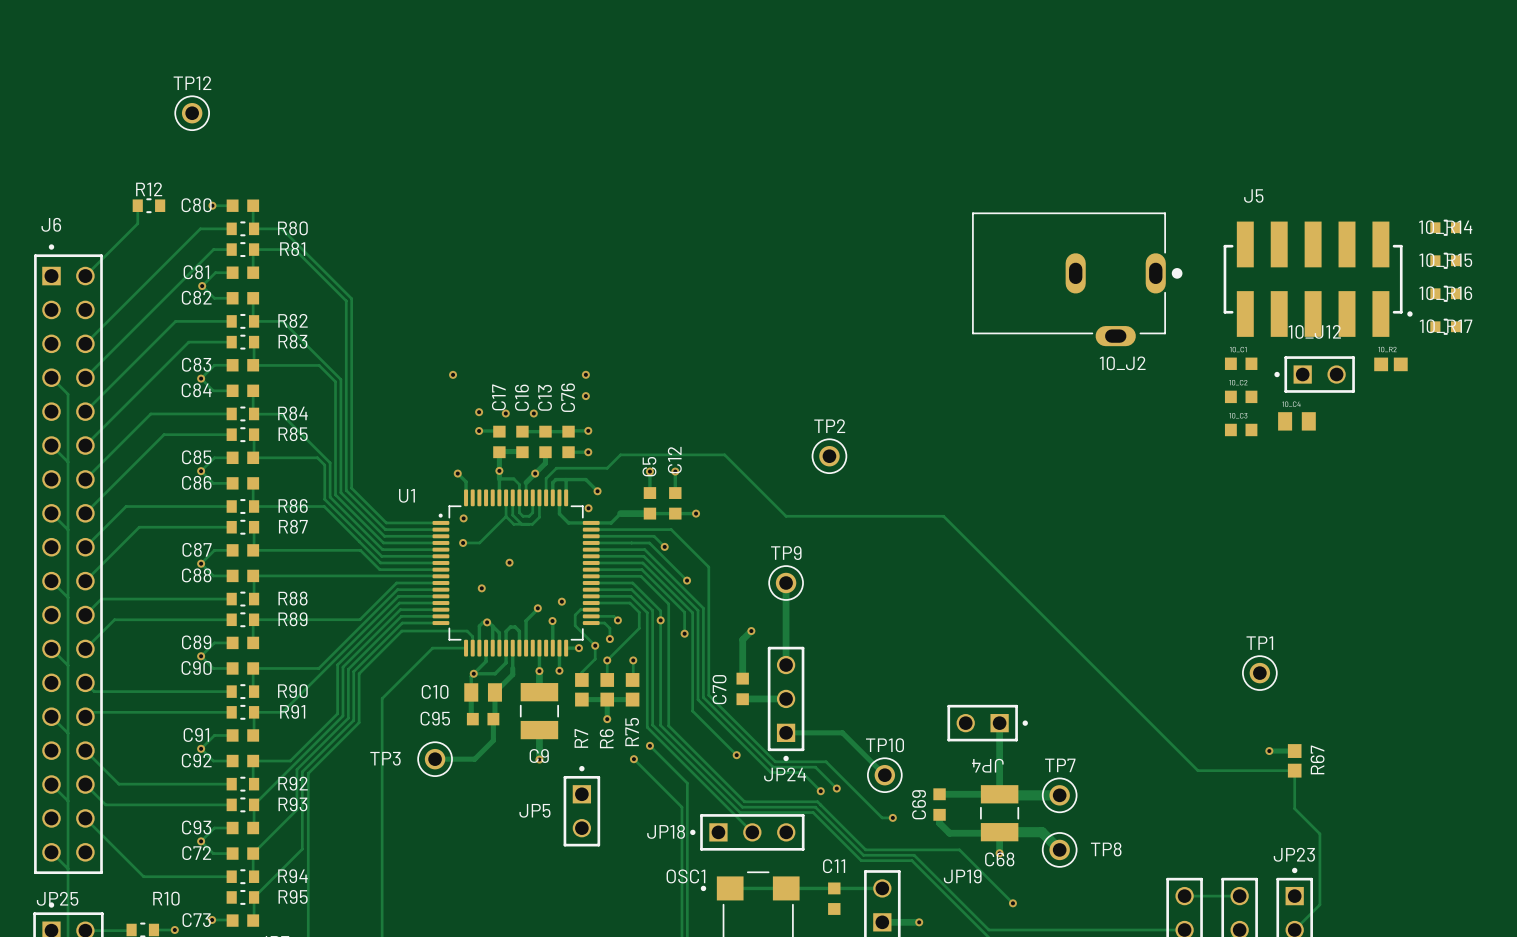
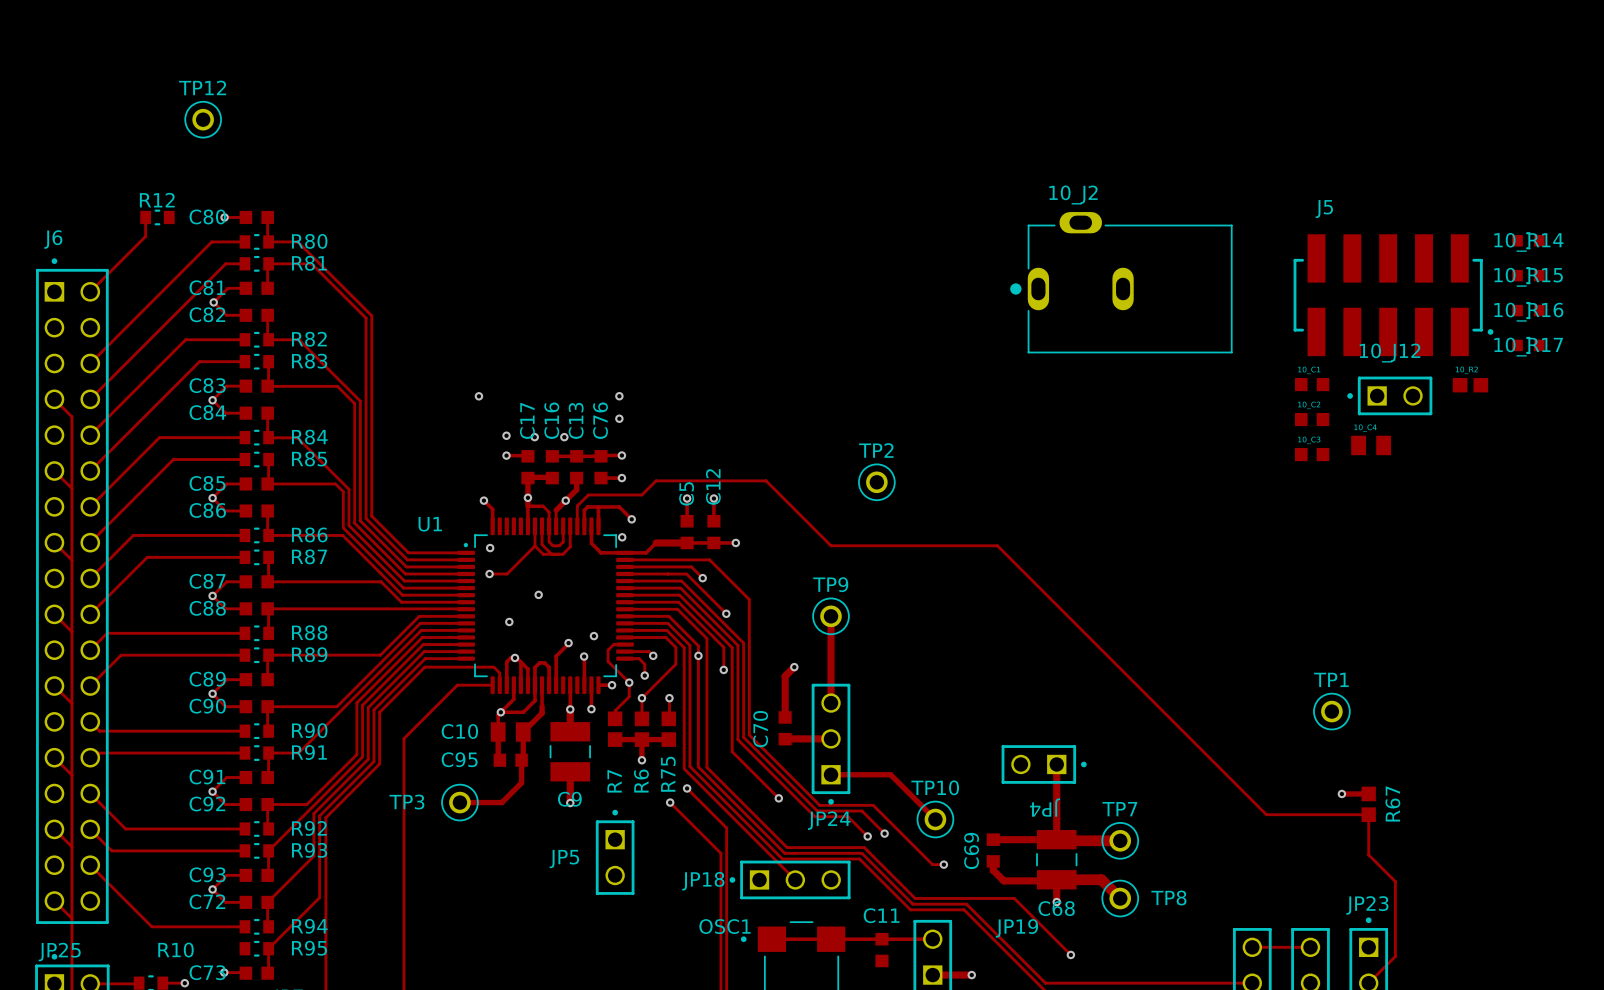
10_J2 rotation: 0° (1077, 279) -> 180° (1121, 282)

